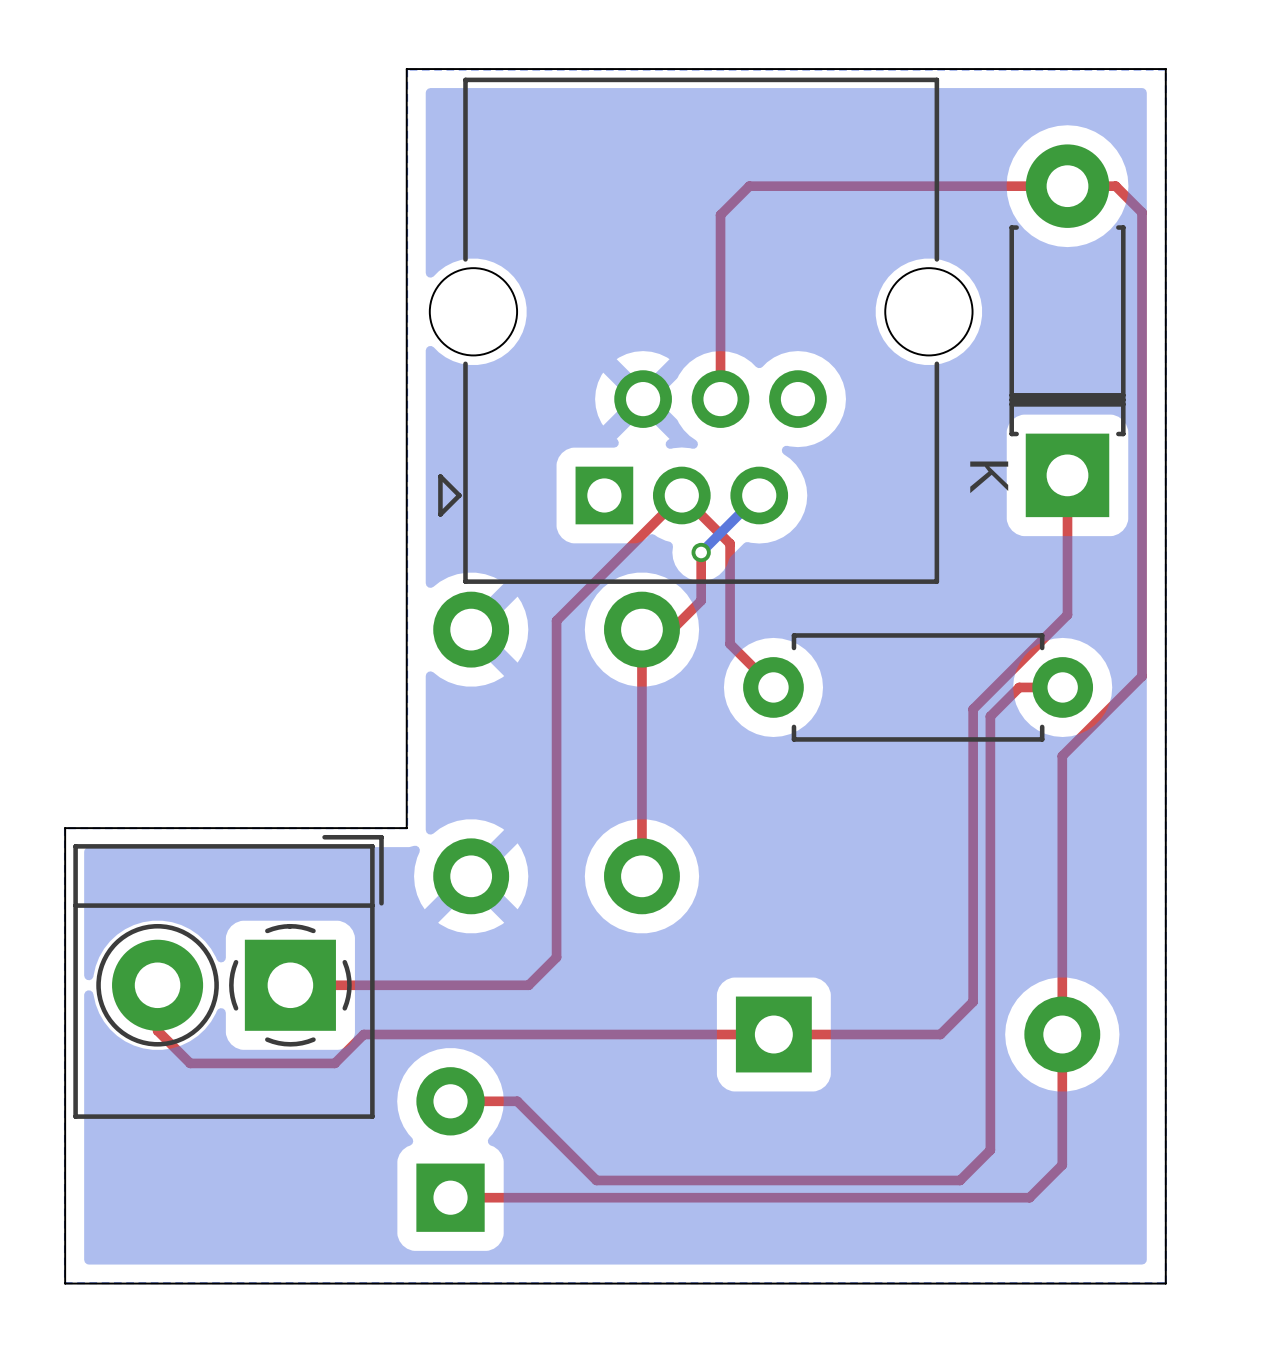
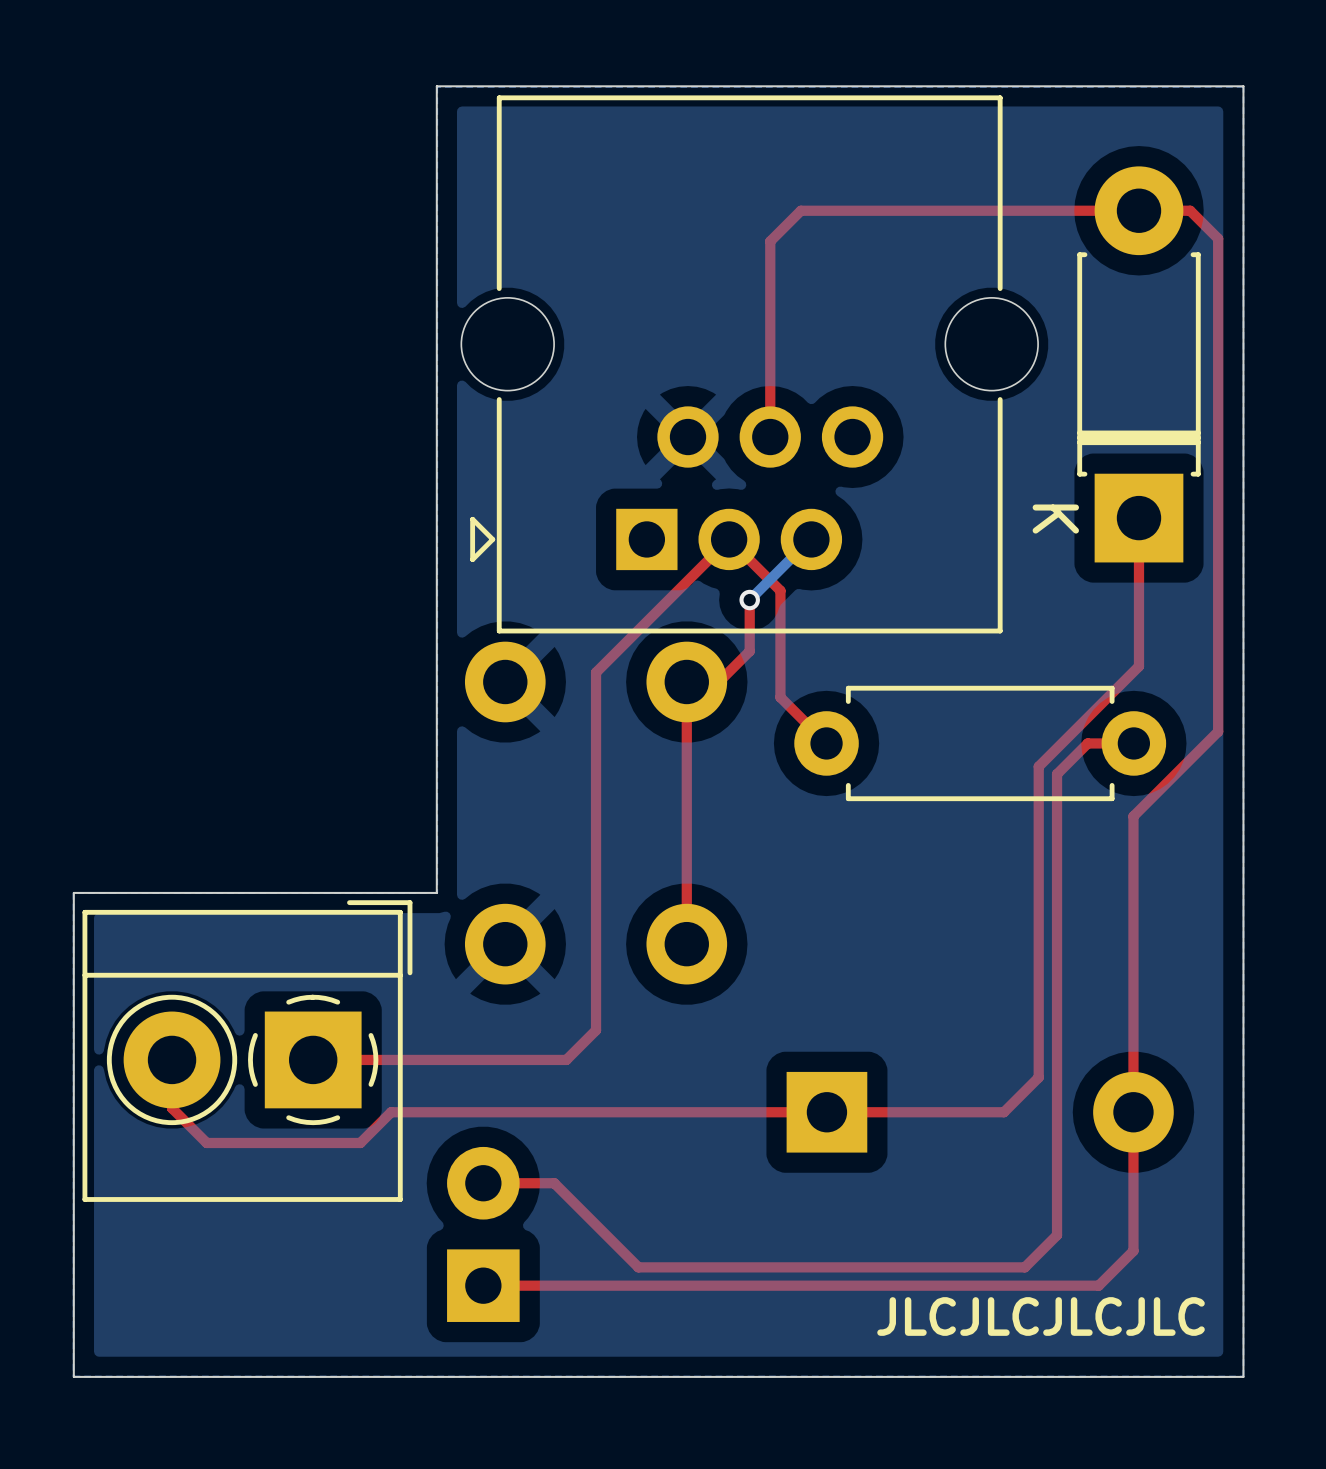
text: none -> JLCJLCJLCJLC (1041, 1316)

